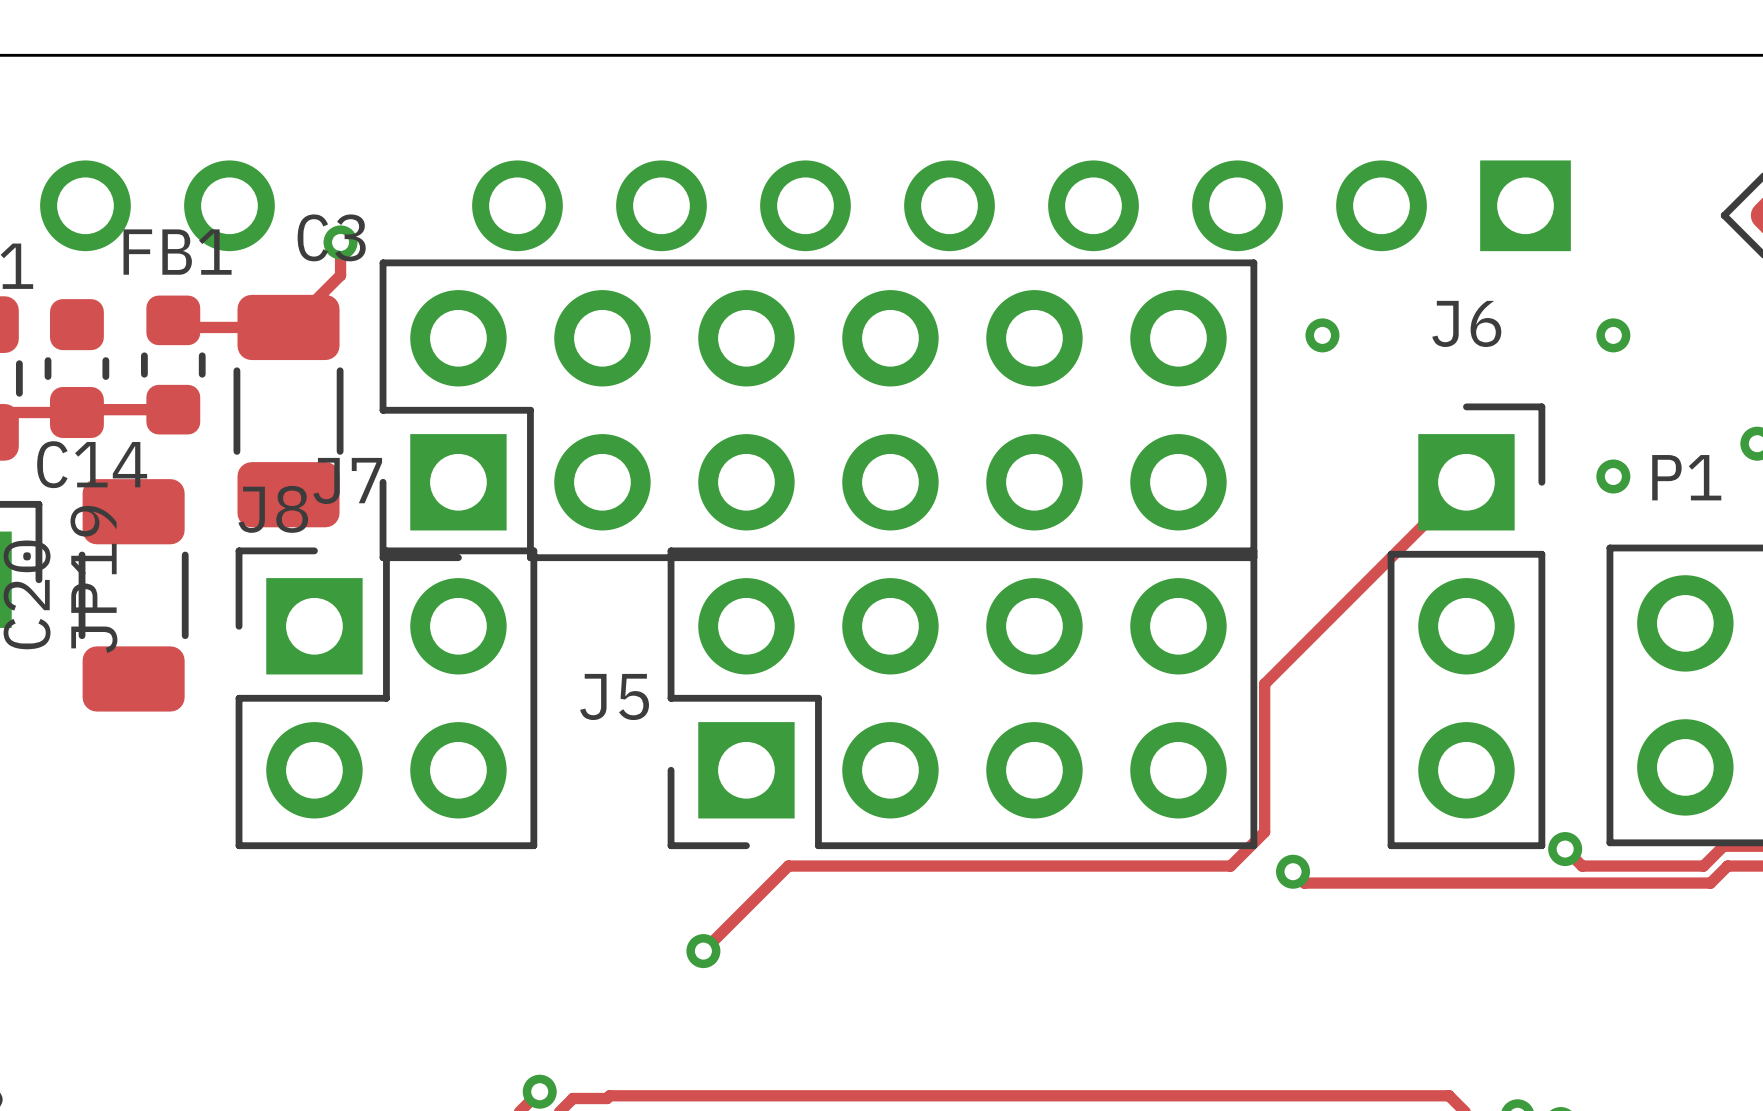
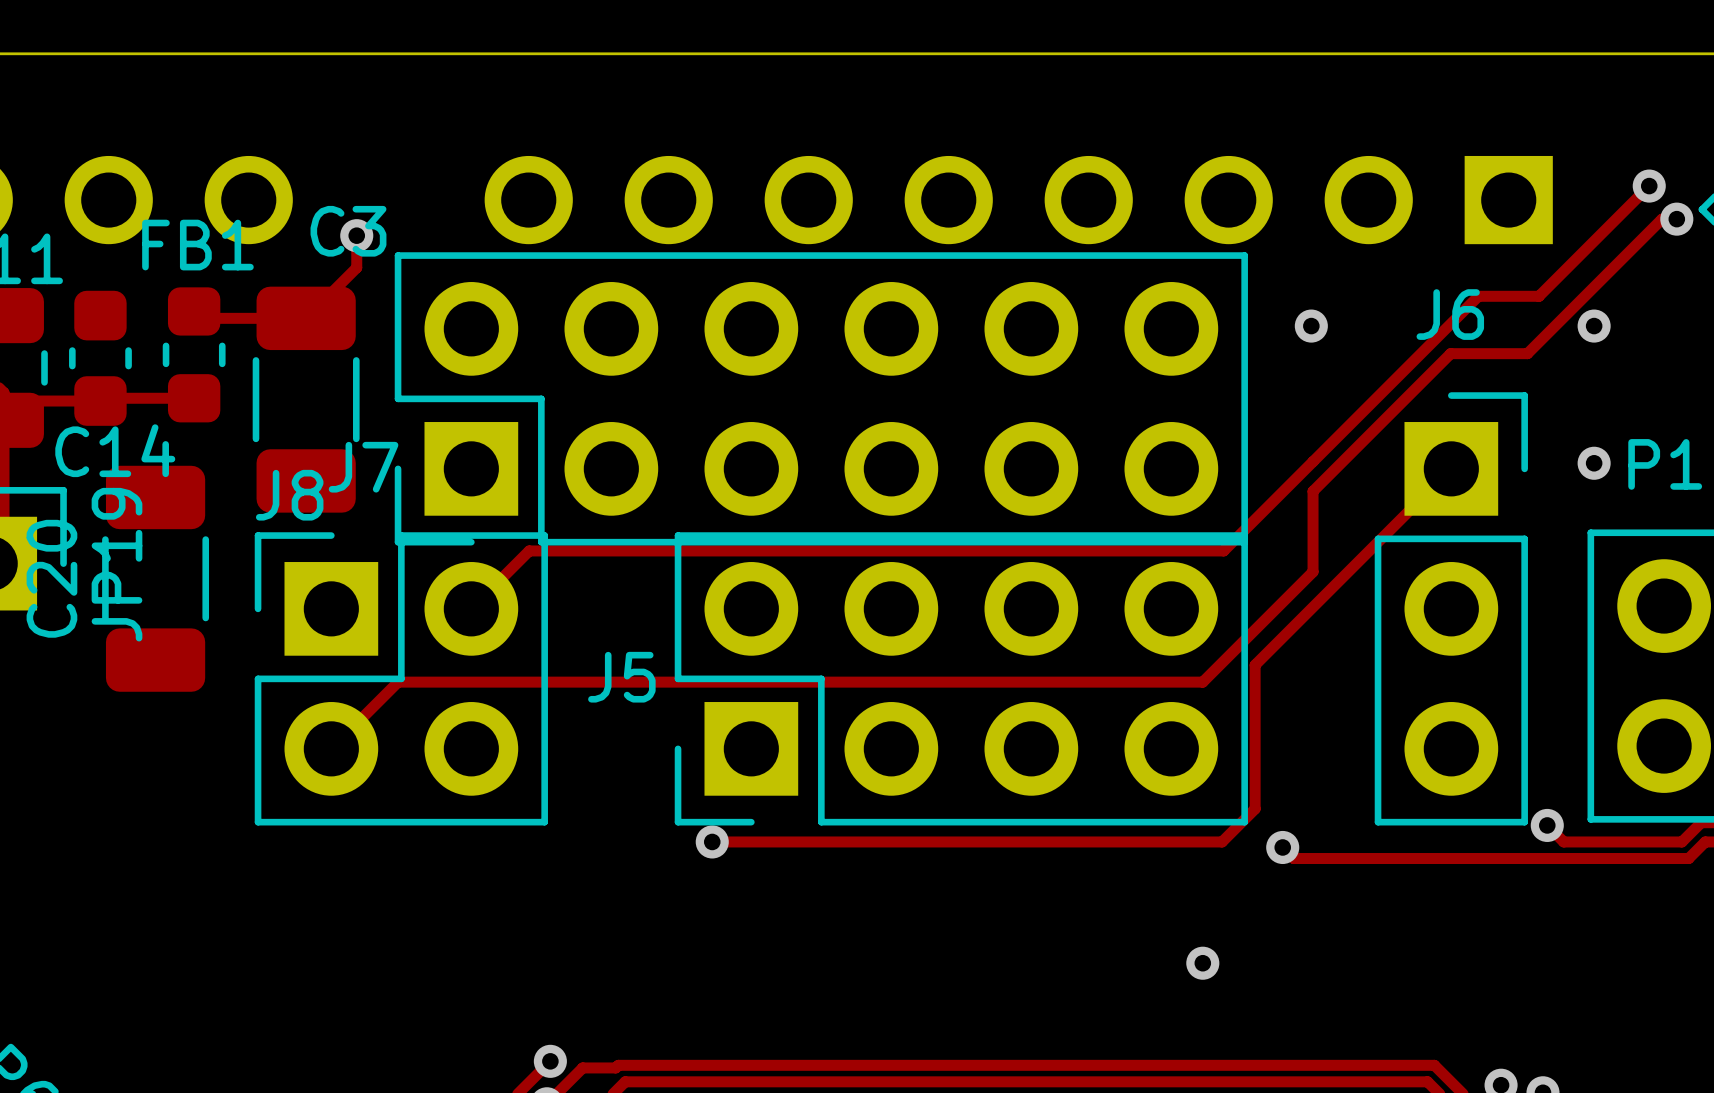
track: none -> (1649, 186) (1539, 296) (1478, 296) (1223, 550) (529, 550) (471, 608)
via: none -> (1649, 186)
track: none -> (1676, 219) (1662, 219) (1527, 353) (1450, 353) (1313, 491) (1313, 571) (1202, 682) (398, 682) (331, 748)
via: none -> (1676, 219)
track: (788, 866) (703, 951) -> (792, 841) (712, 841)
via position: (703, 951) -> (712, 841)
via: none -> (1202, 963)

